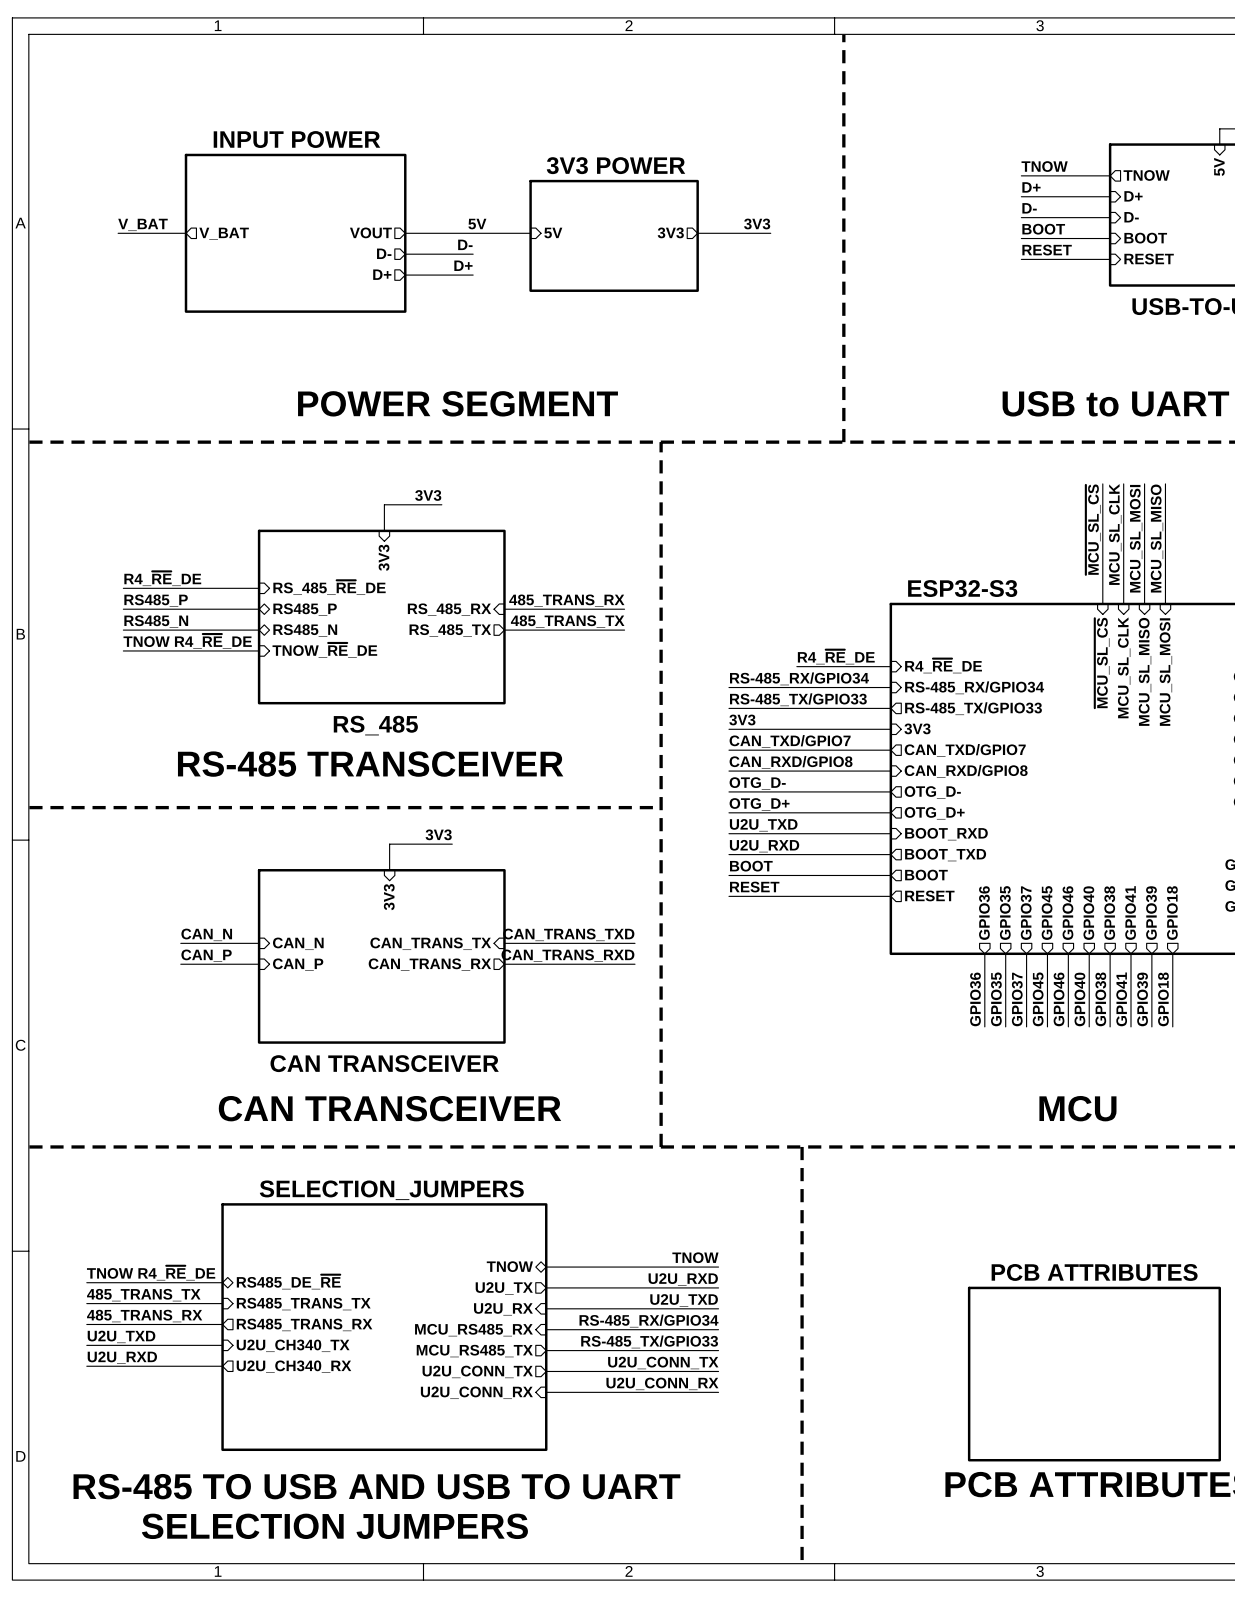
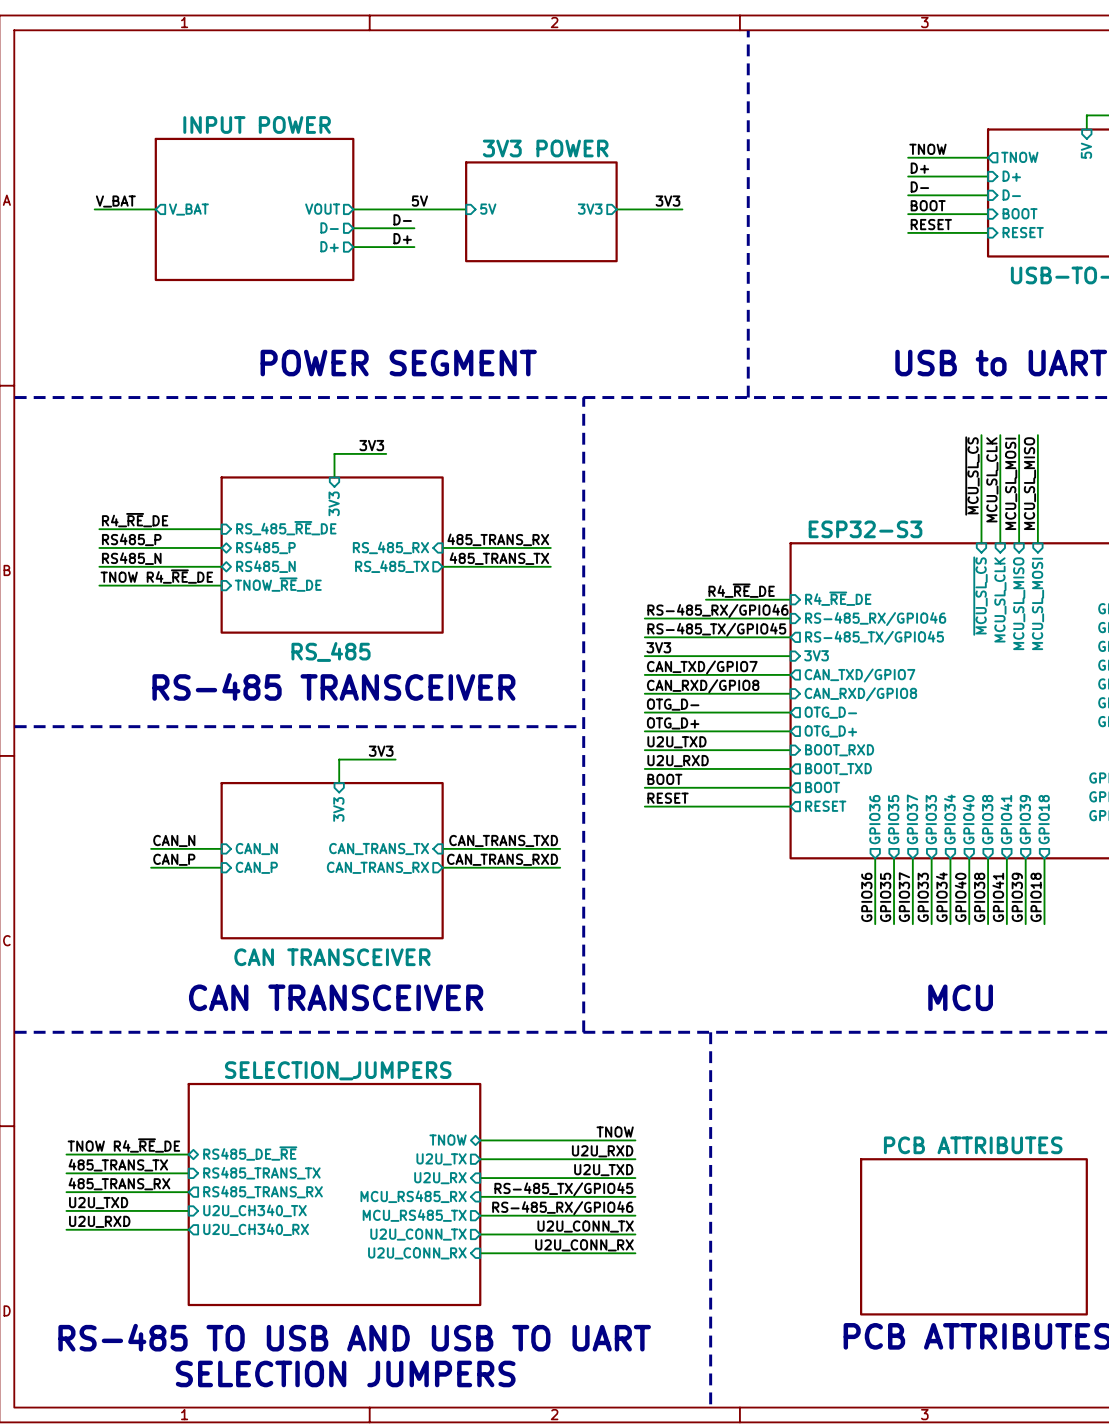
label: RS-485_RX/GPIO34 (799, 678) -> RS-485_RX/GPIO46 (717, 611)
sheet pin: RS-485_RX/GPIO34 (974, 687) -> RS-485_RX/GPIO46 (875, 619)
label: RS-485_TX/GPIO33 (798, 699) -> RS-485_TX/GPIO45 (716, 629)
sheet pin: RS-485_TX/GPIO33 (973, 708) -> RS-485_TX/GPIO45 (874, 637)
sheet pin: GPIO45 (1047, 913) -> GPIO33 (931, 819)
sheet pin: GPIO46 (1067, 913) -> GPIO34 (949, 819)
label: GPIO45 (1038, 999) -> GPIO33 (923, 897)
label: GPIO46 (1059, 999) -> GPIO34 (941, 897)
label: RS-485_RX/GPIO34 (648, 1321) -> RS-485_TX/GPIO45 (563, 1189)
label: RS-485_TX/GPIO33 (649, 1341) -> RS-485_RX/GPIO46 (562, 1208)

